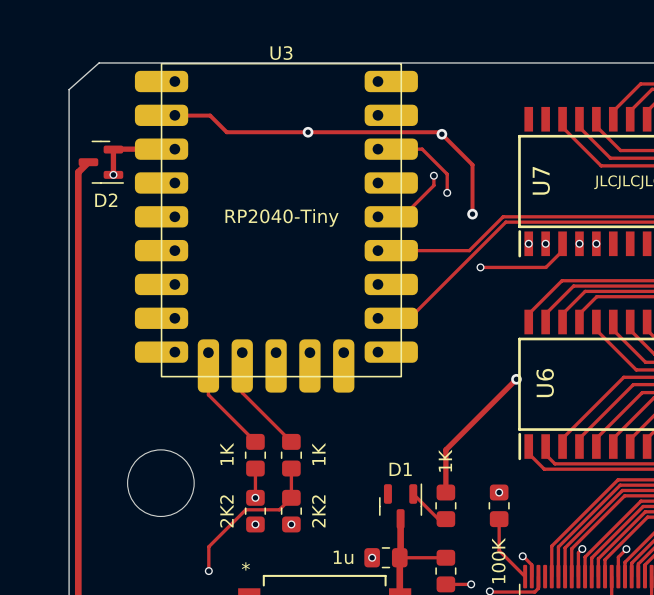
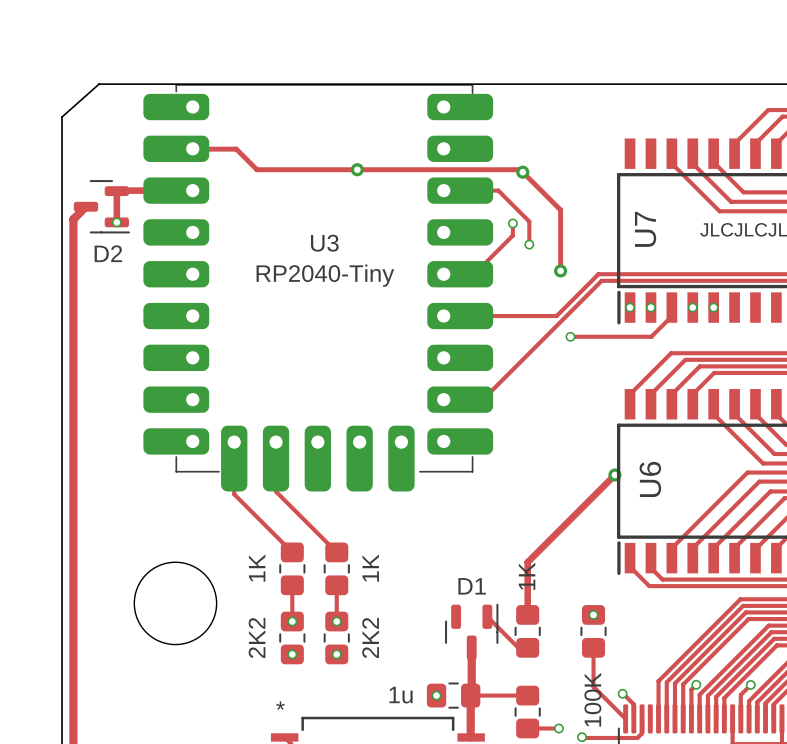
U3 name position: U3 (281, 53) -> U3 (324, 243)
U3 footprint: [134, 62, 418, 393] -> [143, 84, 494, 492]
track: (291, 497) (279, 509) (245, 509) (208, 546) (208, 571) -> none
via: none -> (336, 621)
via: (208, 571) -> none

